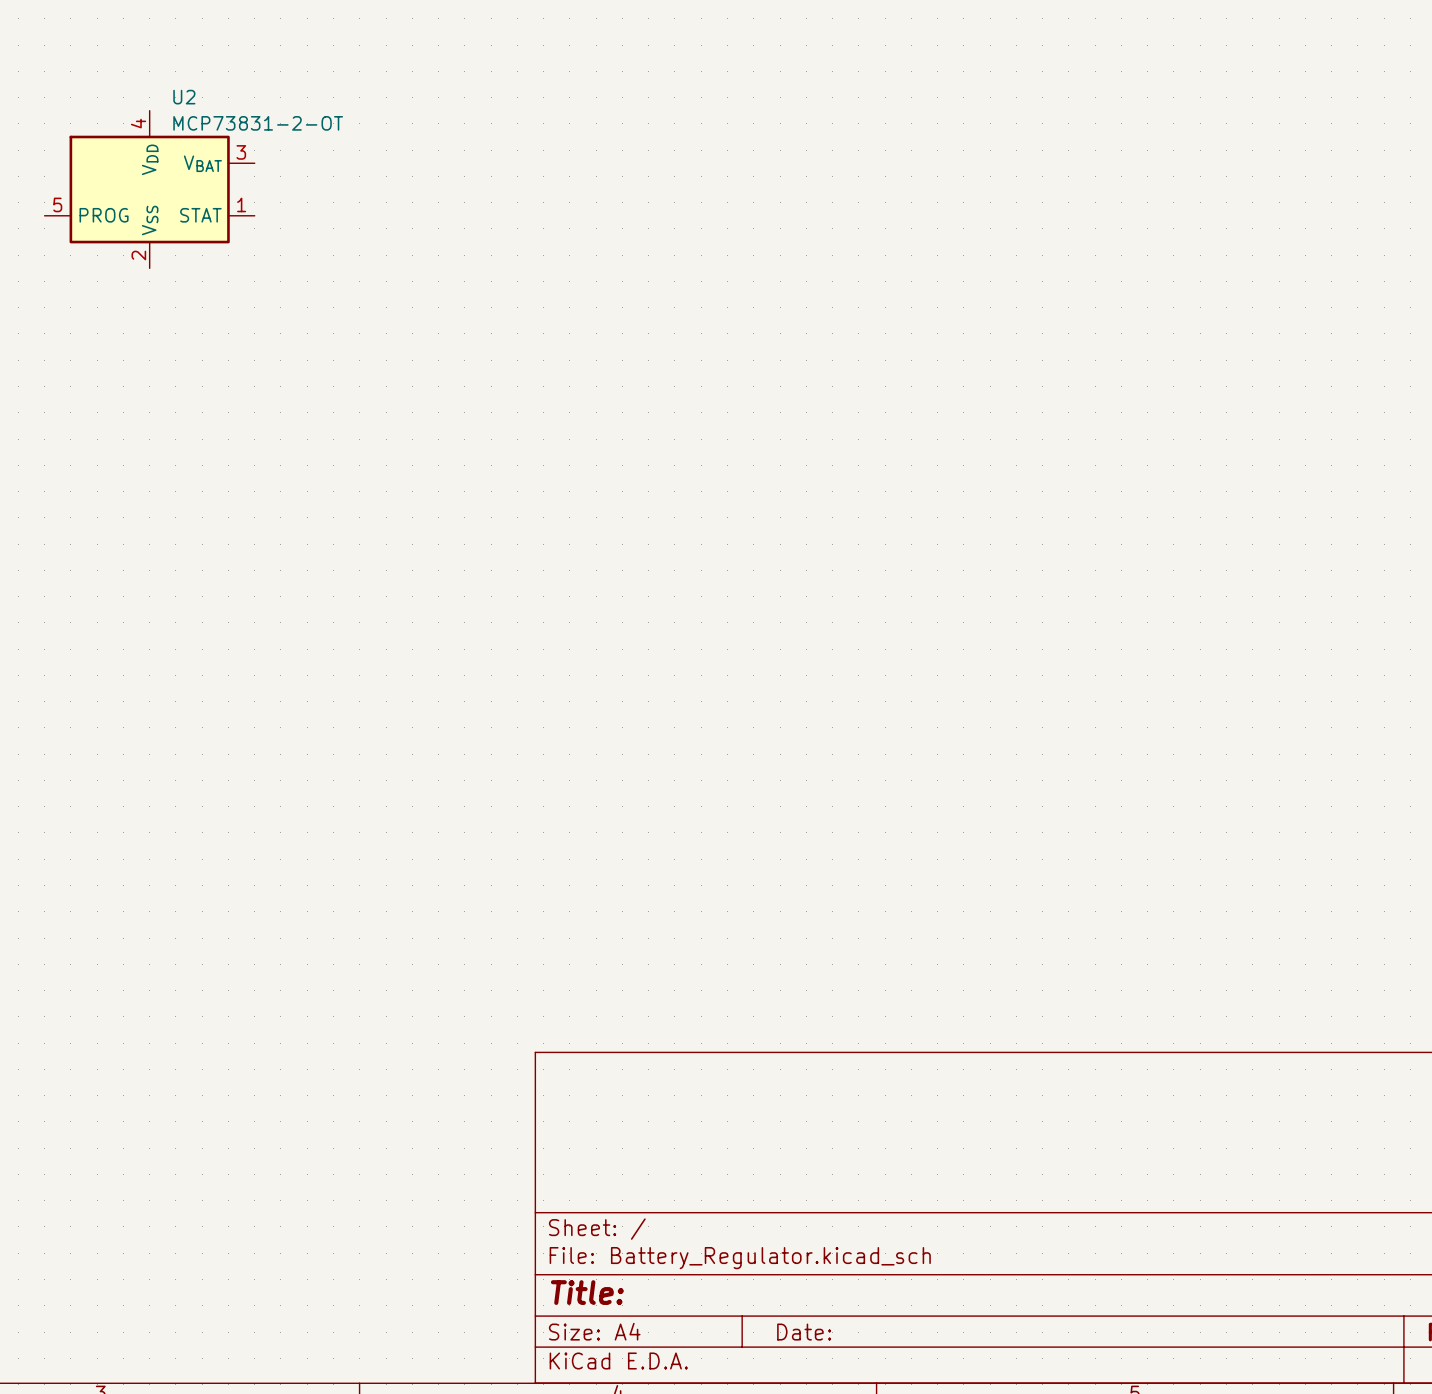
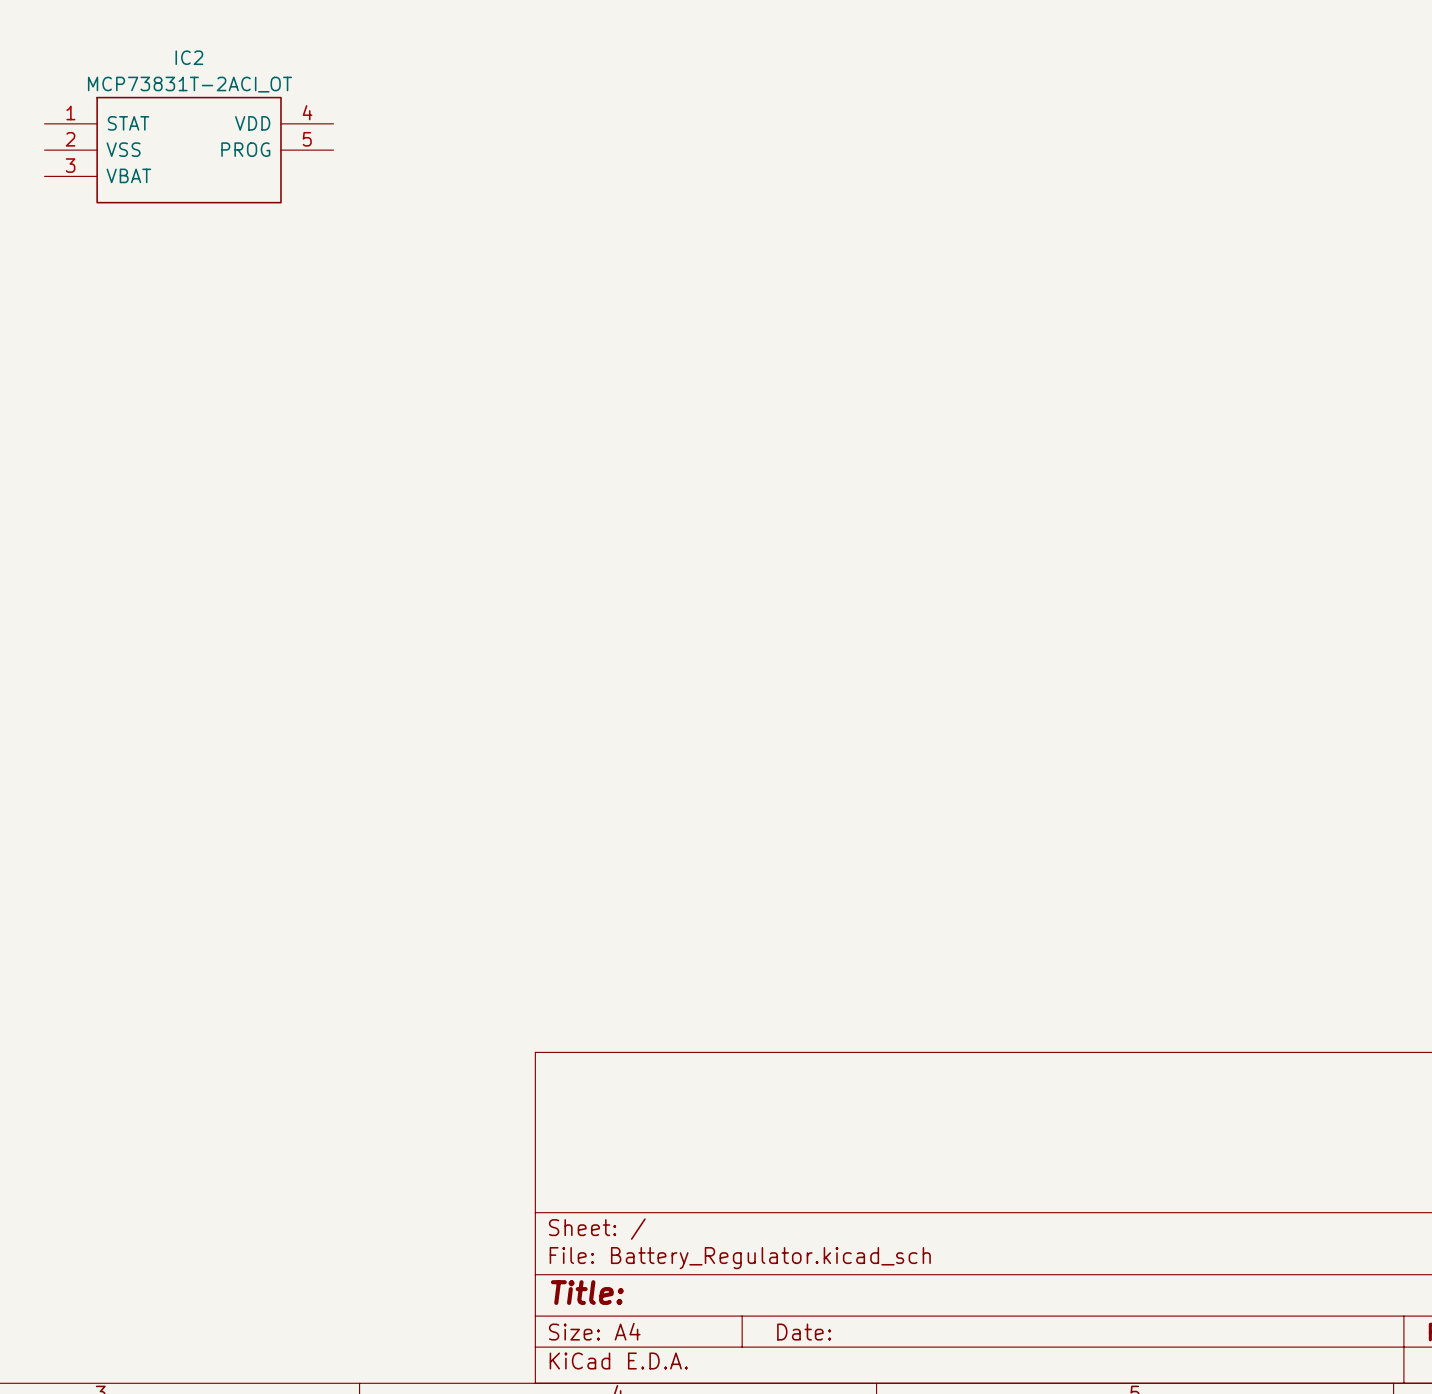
IC2: none -> MCP73831T-2ACI_OT (189, 150)
U2: MCP73831-2-OT (149, 189) -> none

